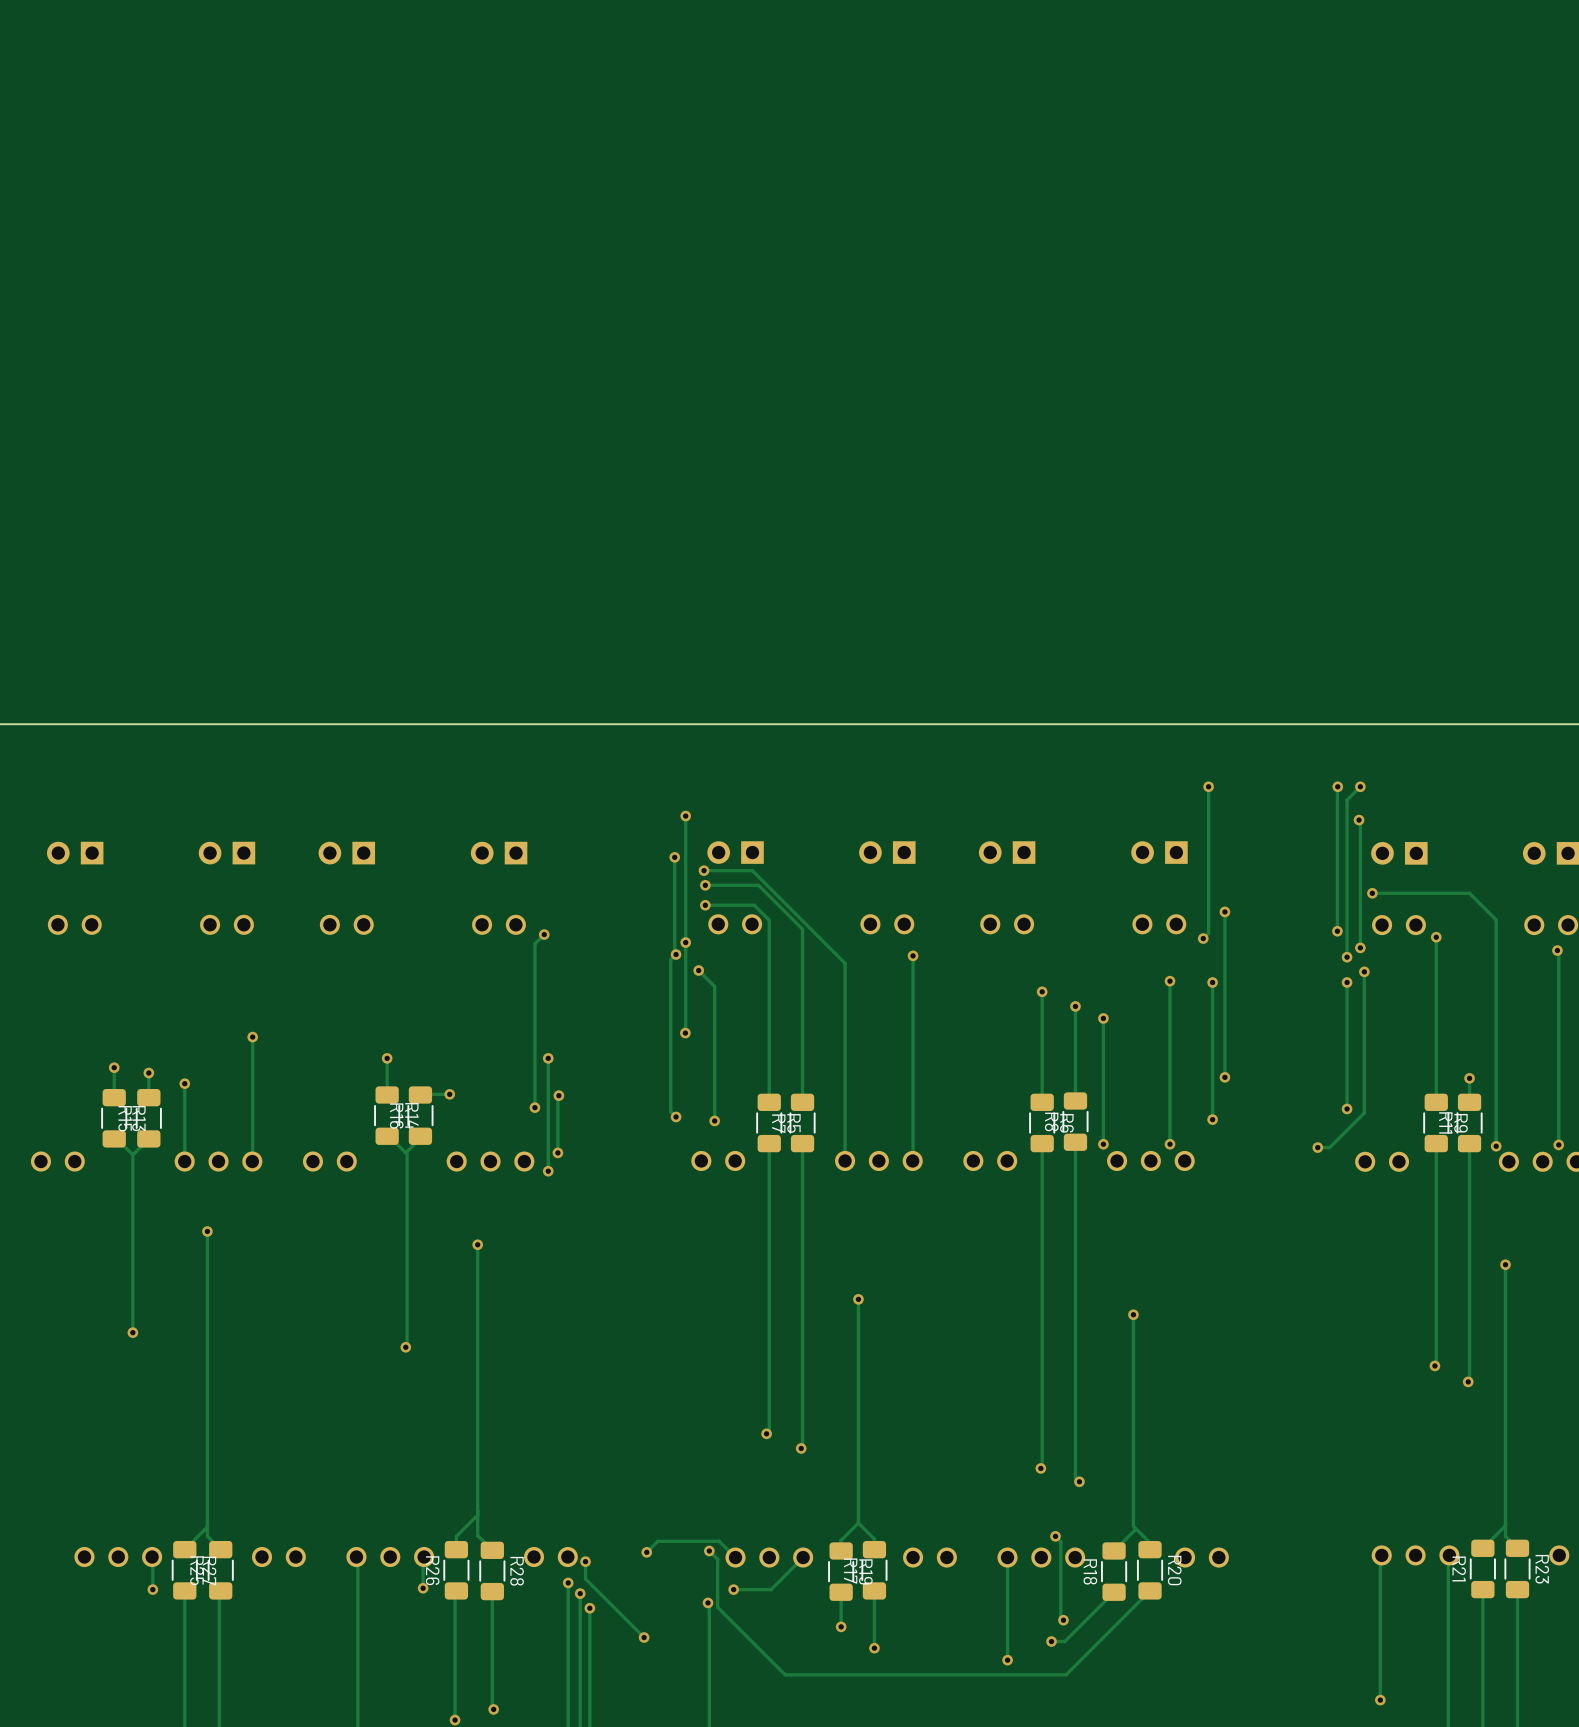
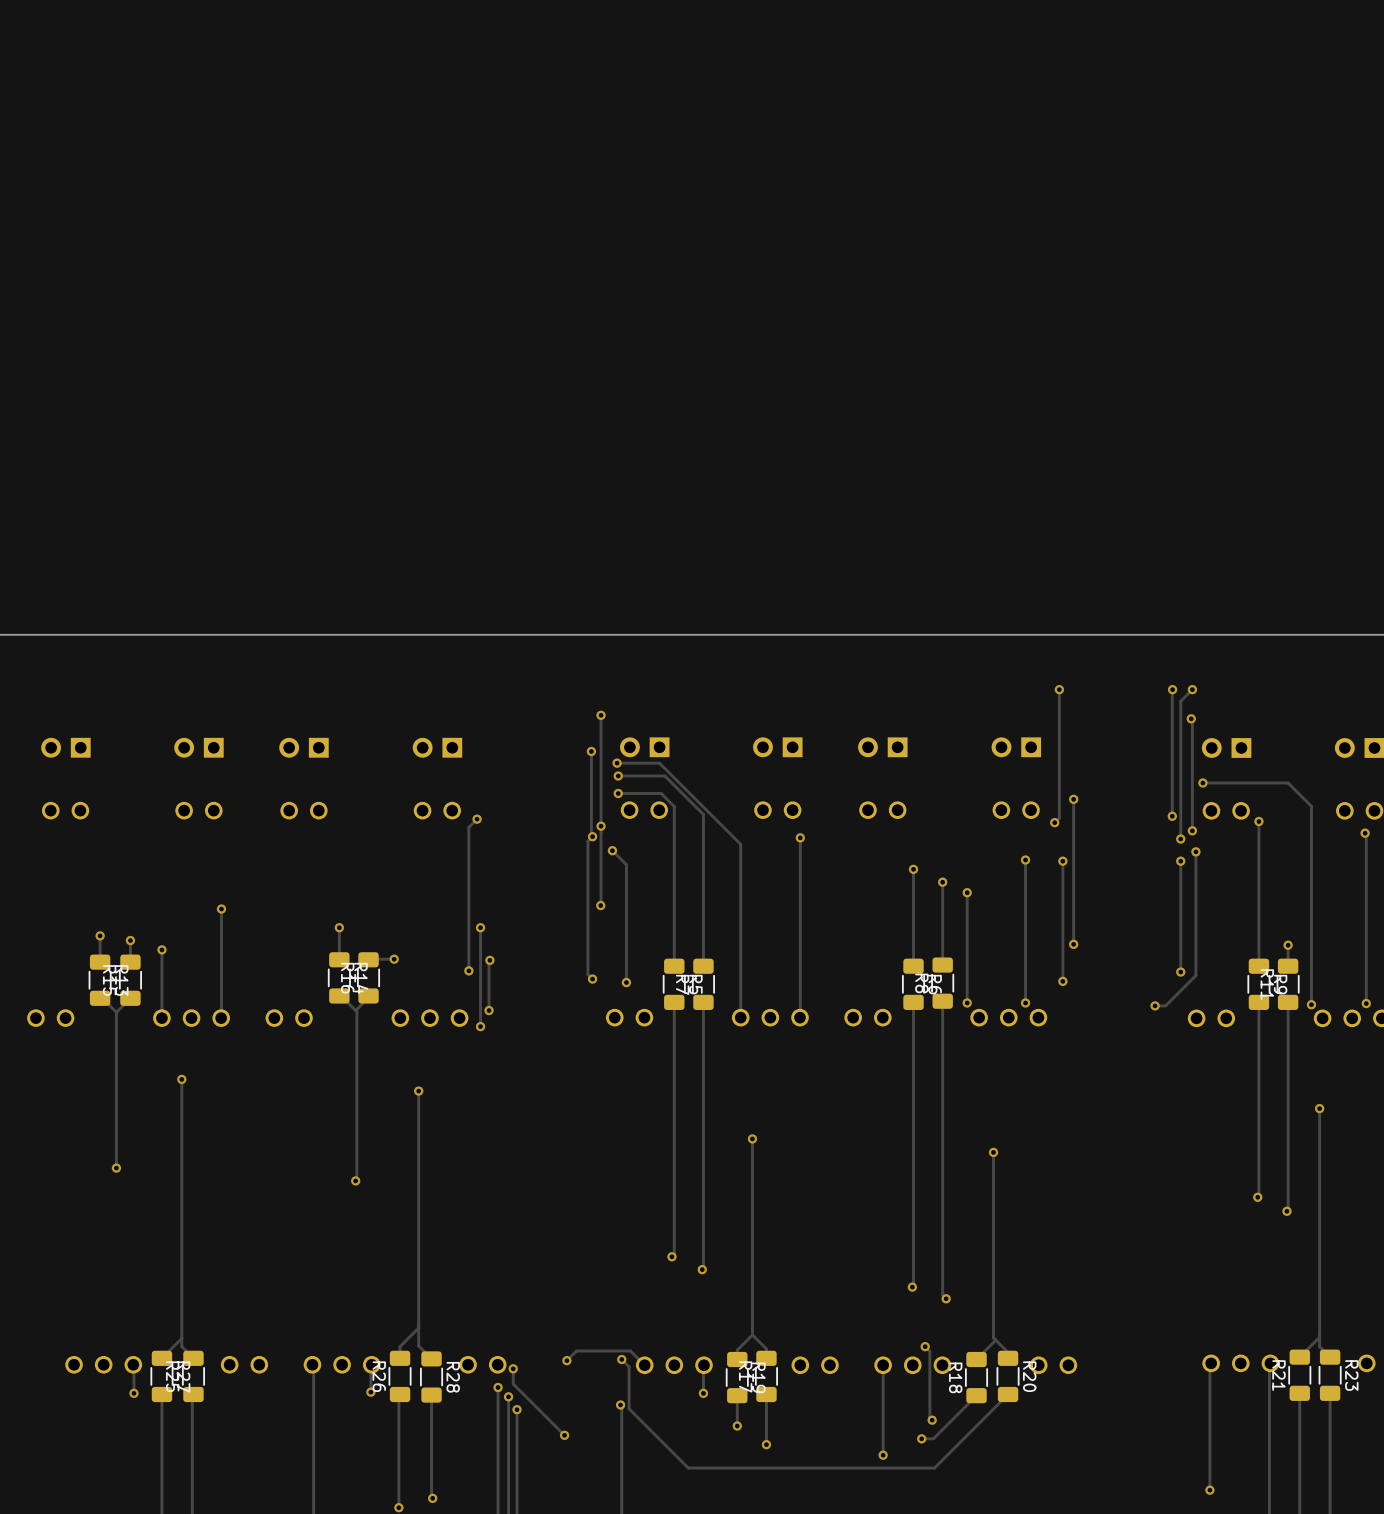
track: (802, 1558) (771, 1589) (733, 1589) -> (703, 1365) (703, 1393)
via position: (733, 1589) -> (703, 1393)

